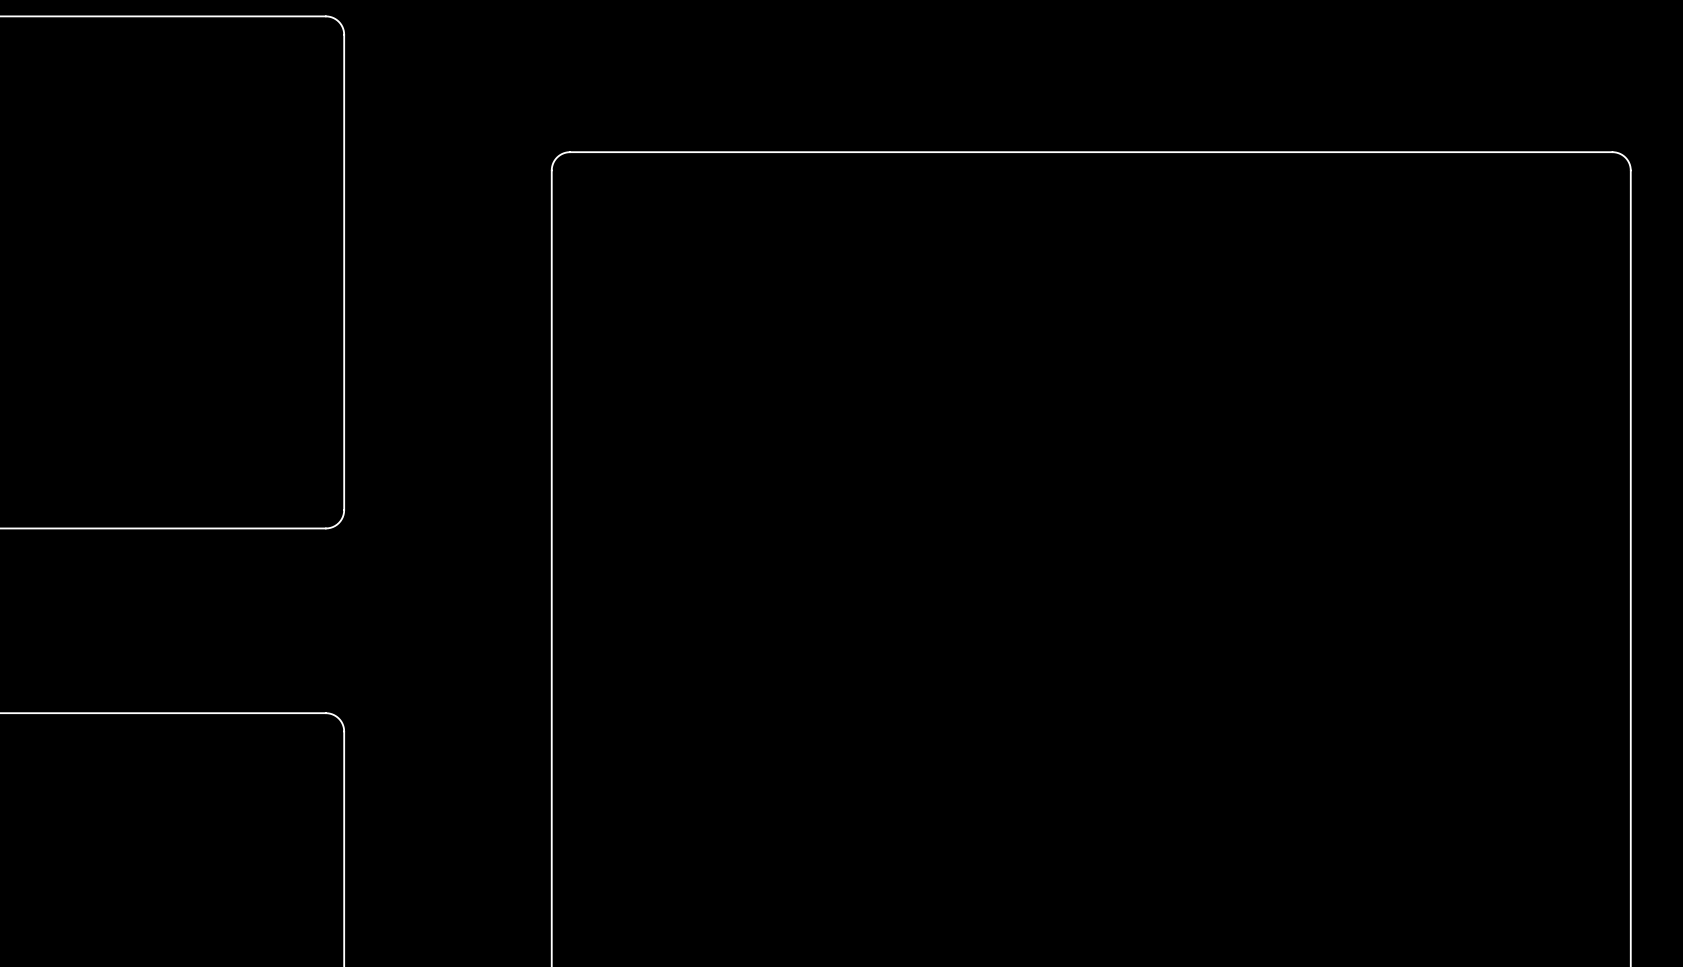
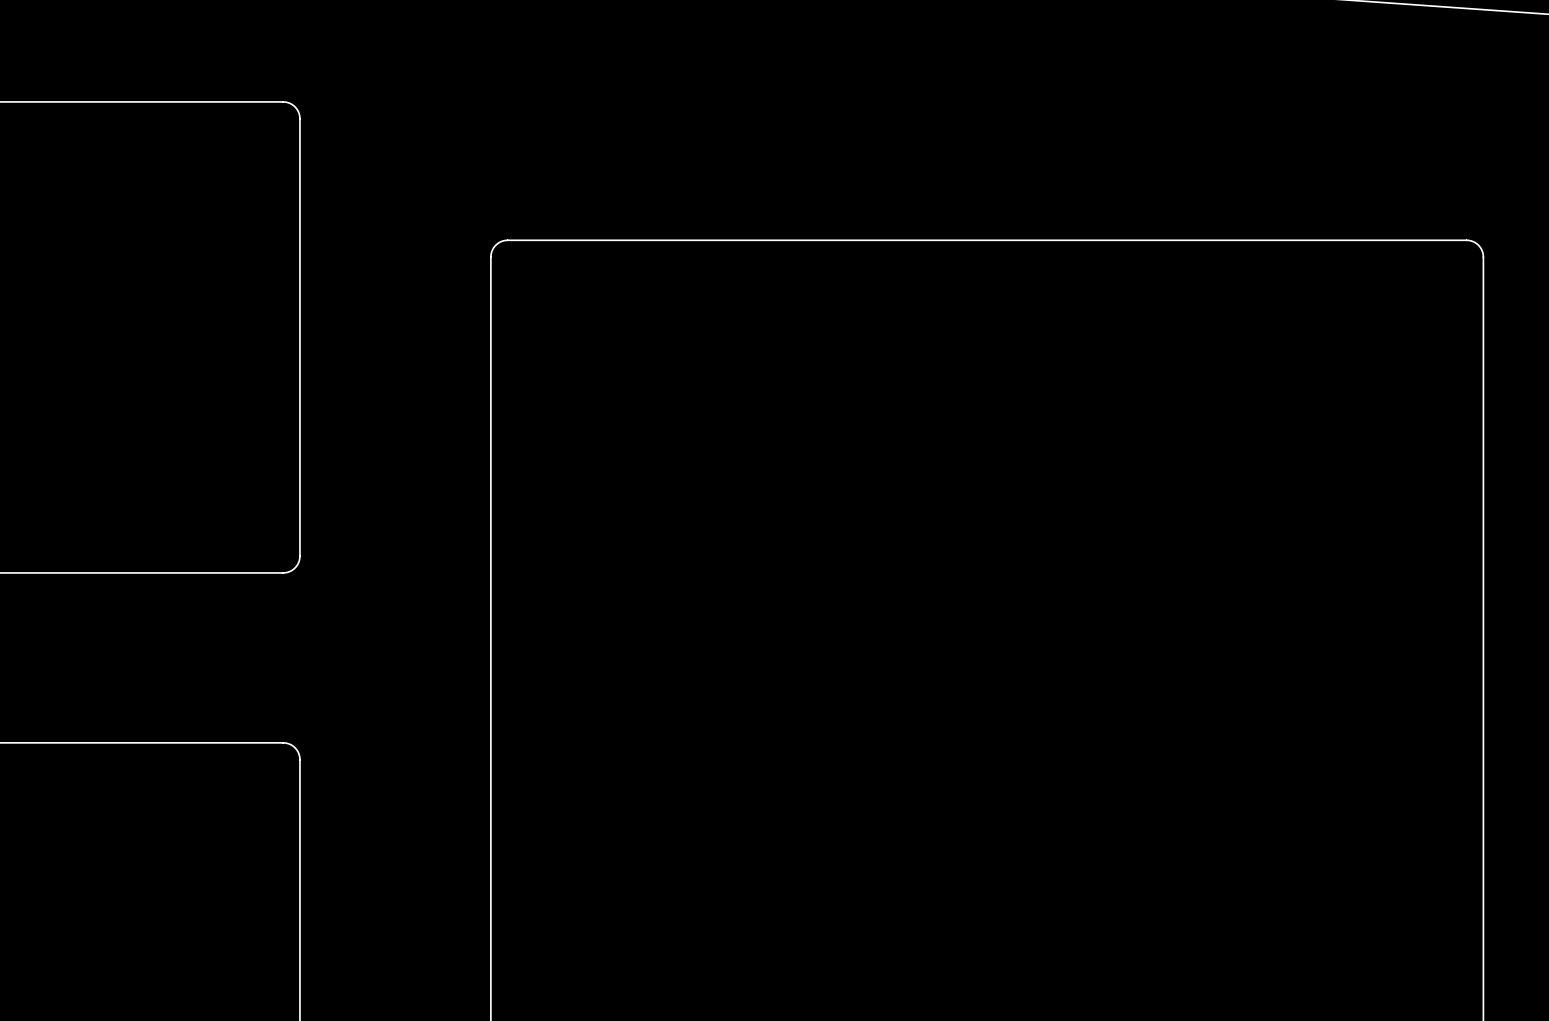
board edge: (551, 185) (551, 168) (554, 160) (560, 154) (570, 152) (1612, 152) (1620, 153) (1627, 160) (1630, 168) (1630, 185) -> (490, 257) (495, 245) (507, 240) (1466, 240) (1478, 245) (1483, 257)

